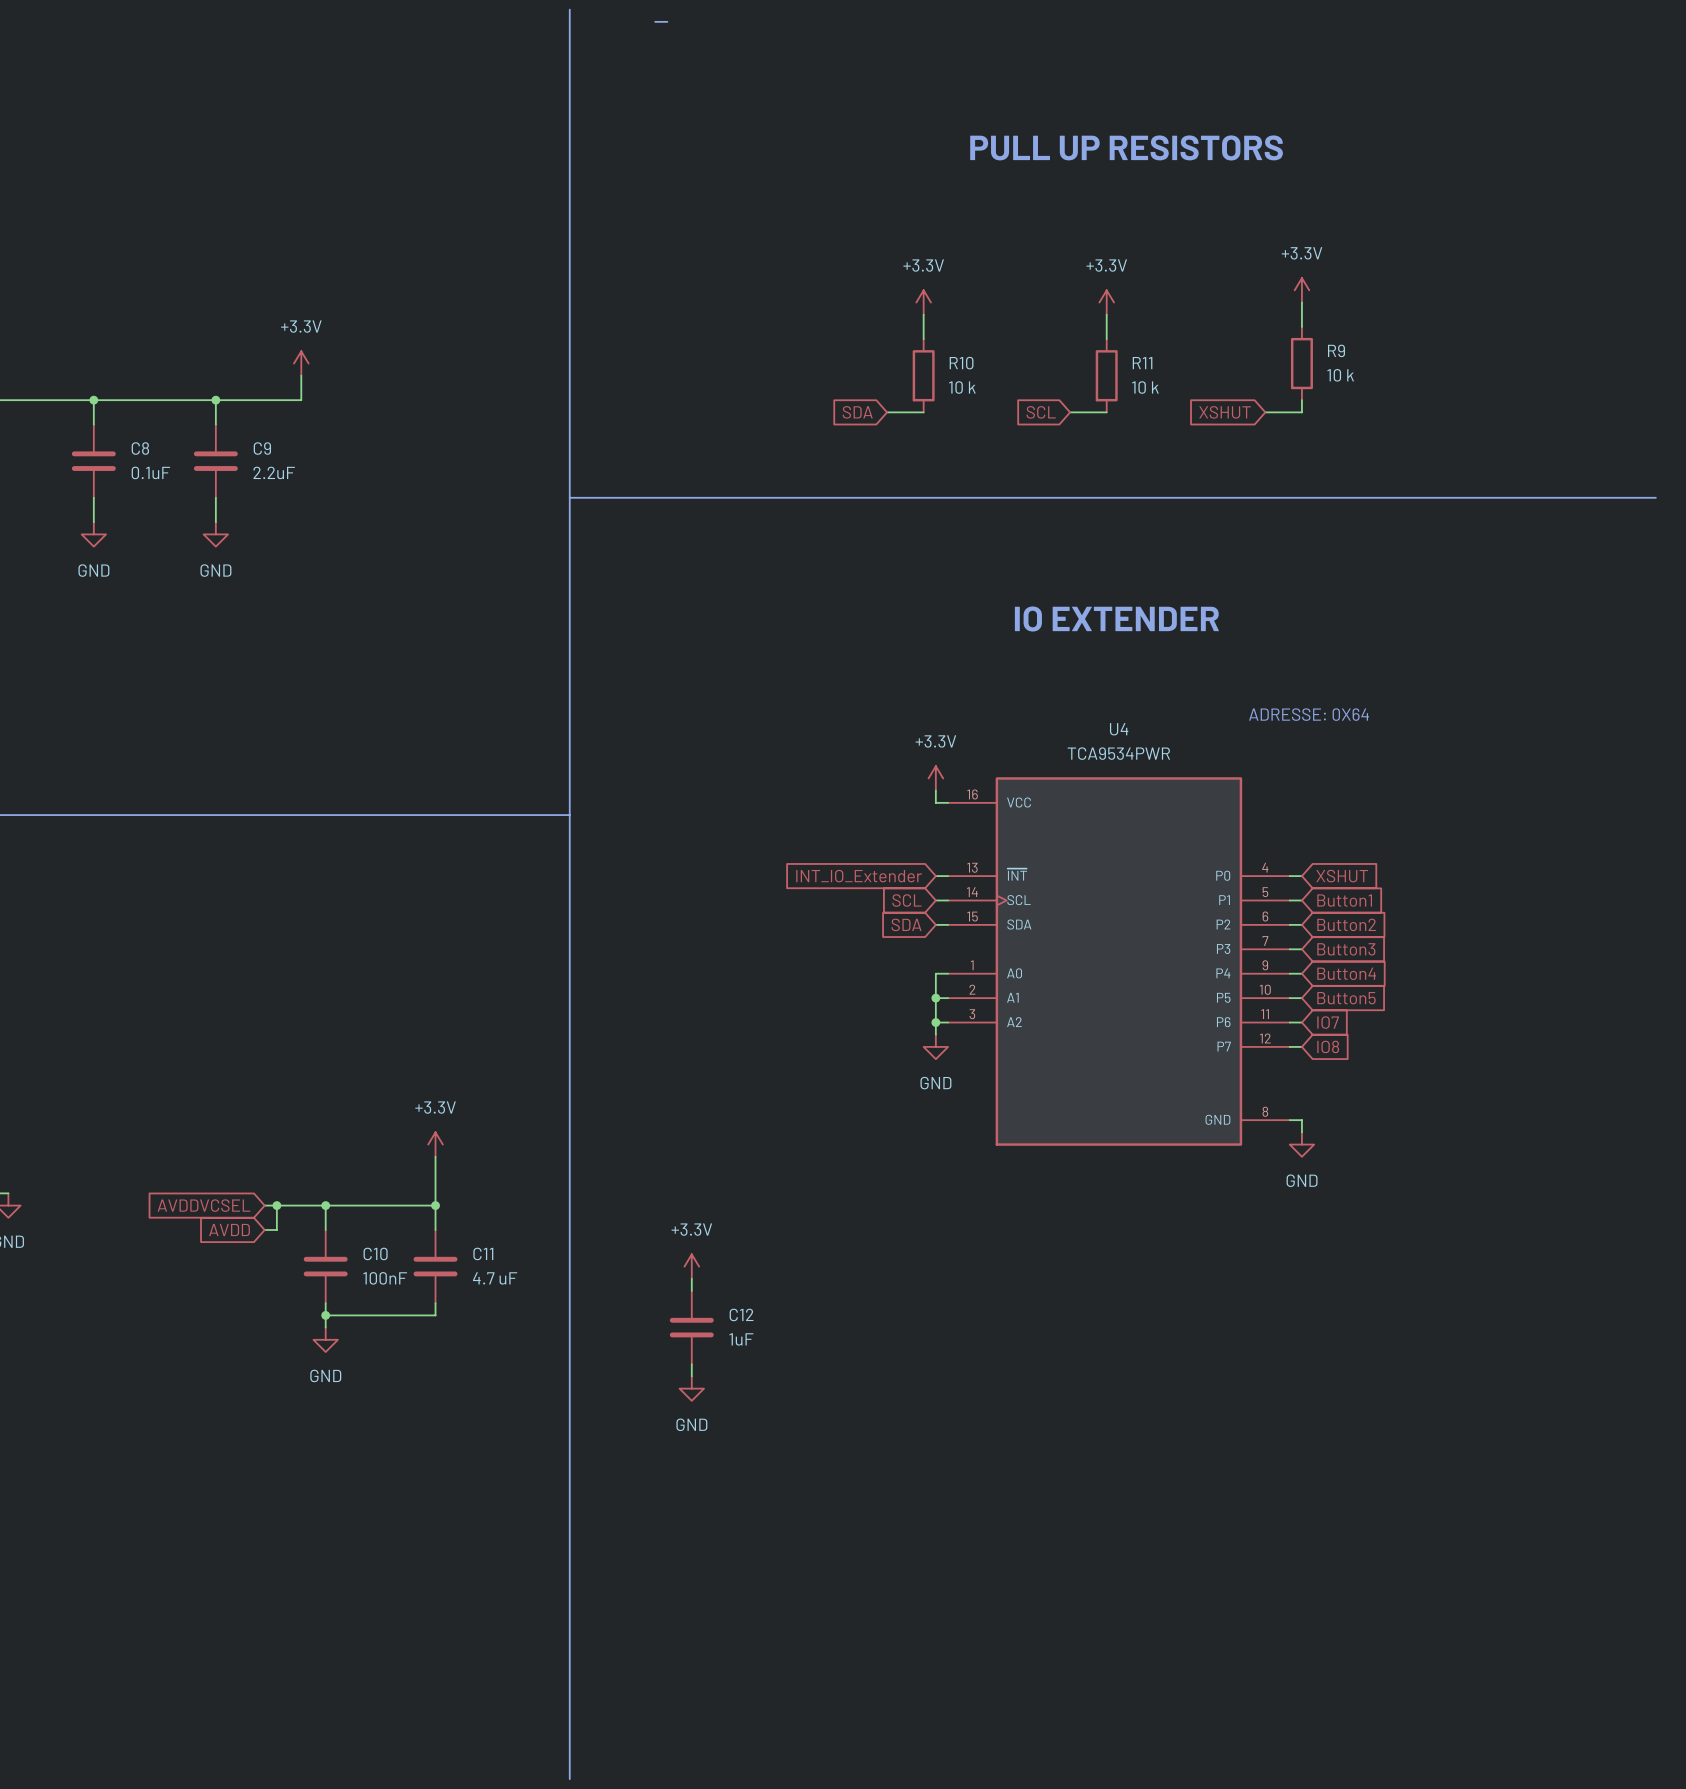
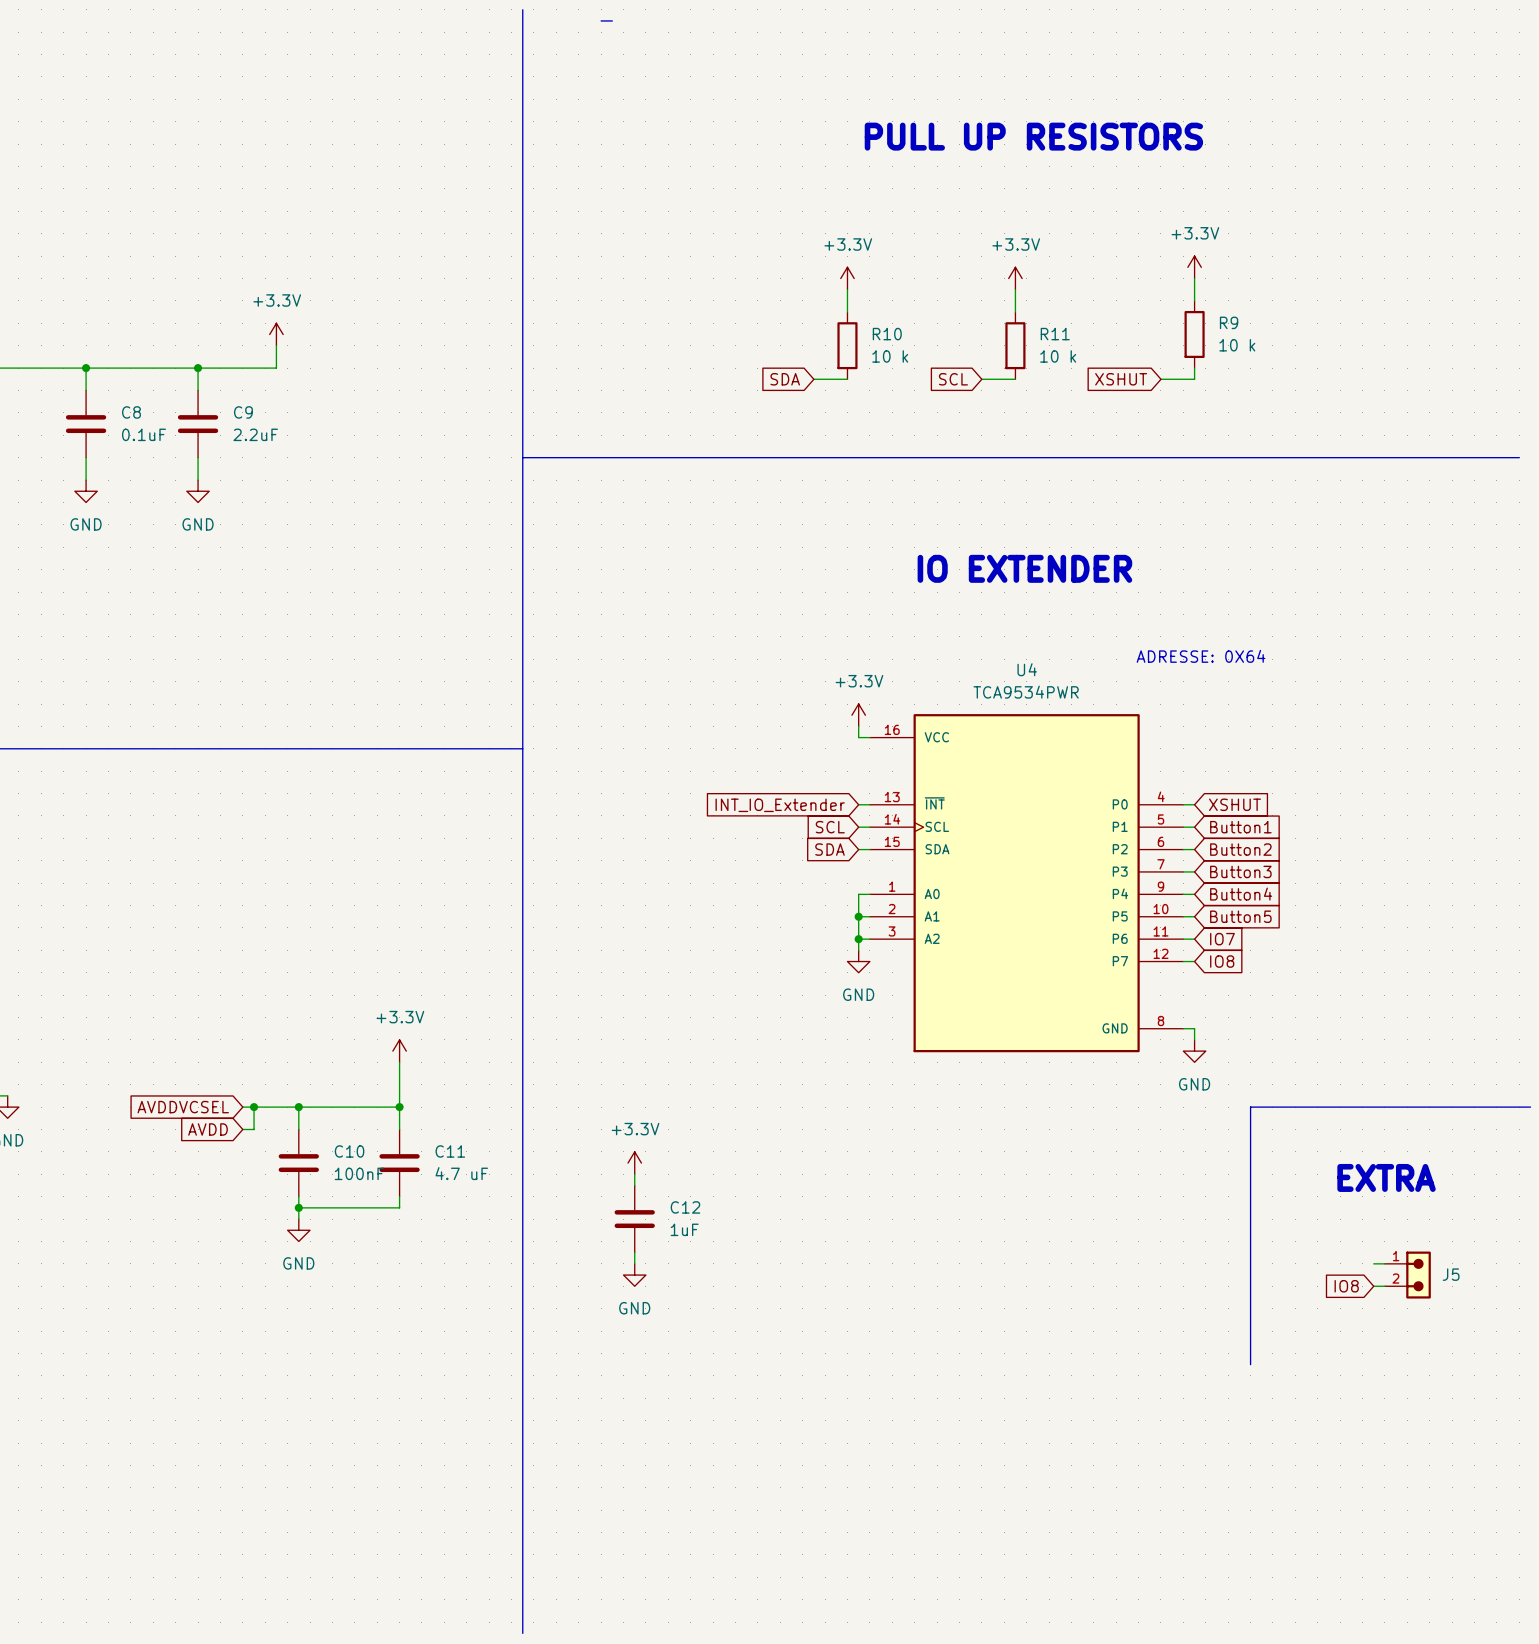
line: none -> (1530, 1107) (1250, 1107) (1250, 1364)
text: none -> EXTRA (1386, 1177)
wire: none -> (1373, 1263) (1384, 1263)
J5: none -> (1407, 1275)
global label: none -> IO8 (1346, 1286)
wire: none -> (1373, 1286) (1384, 1286)

